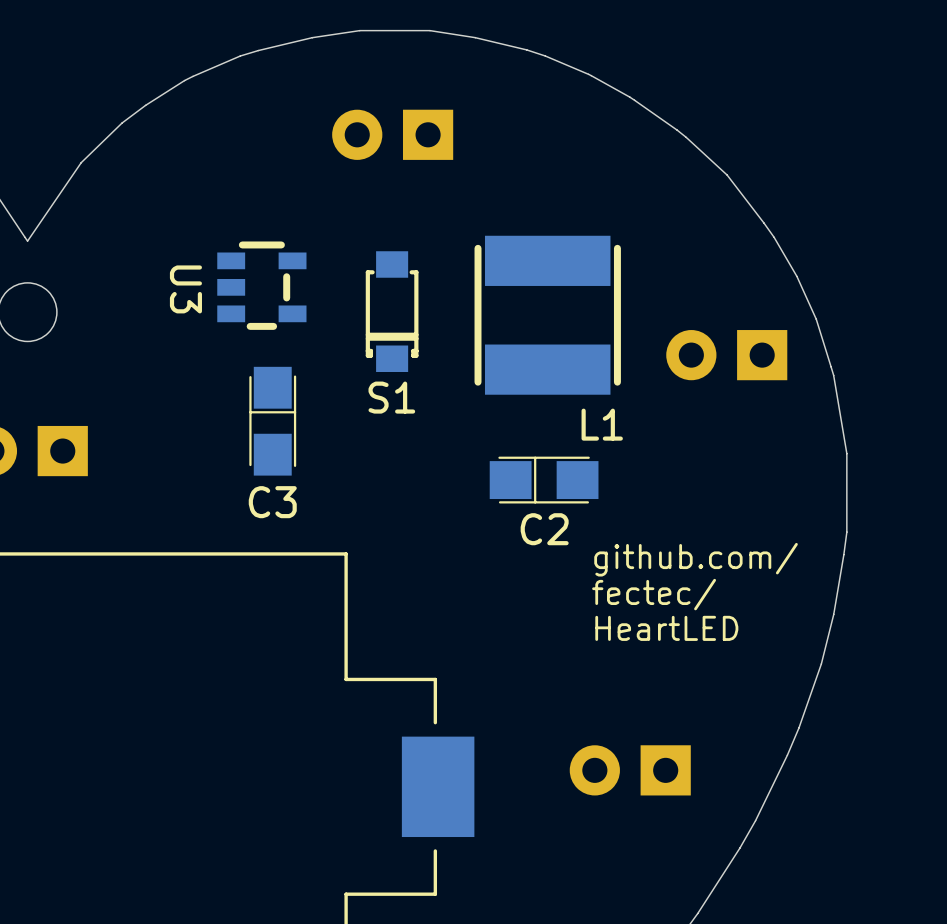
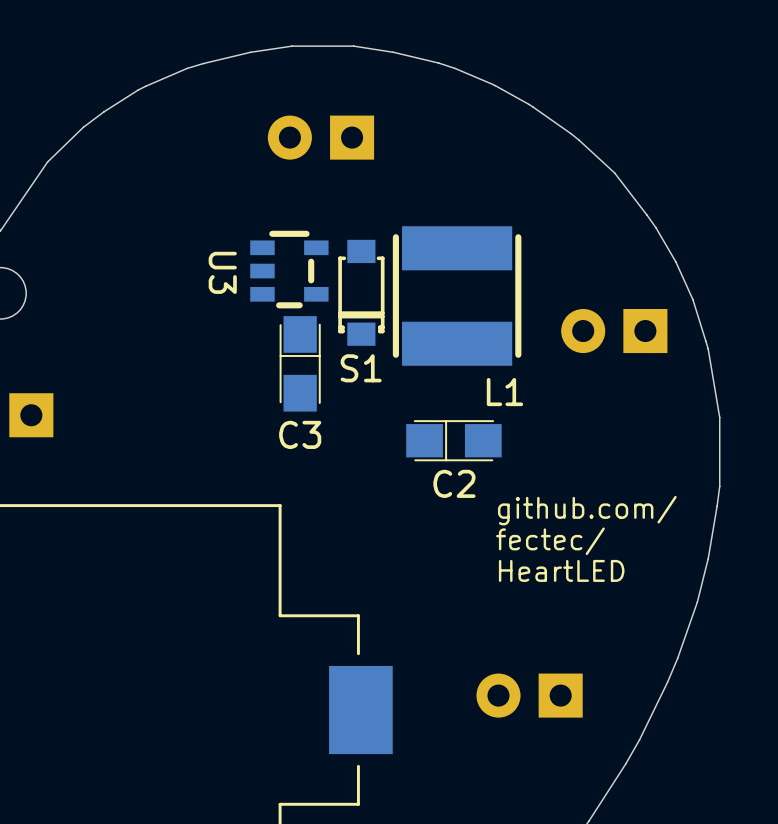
U3 position: (261, 285) -> (289, 269)
S1 position: (392, 311) -> (361, 292)
C3 position: (272, 421) -> (300, 363)

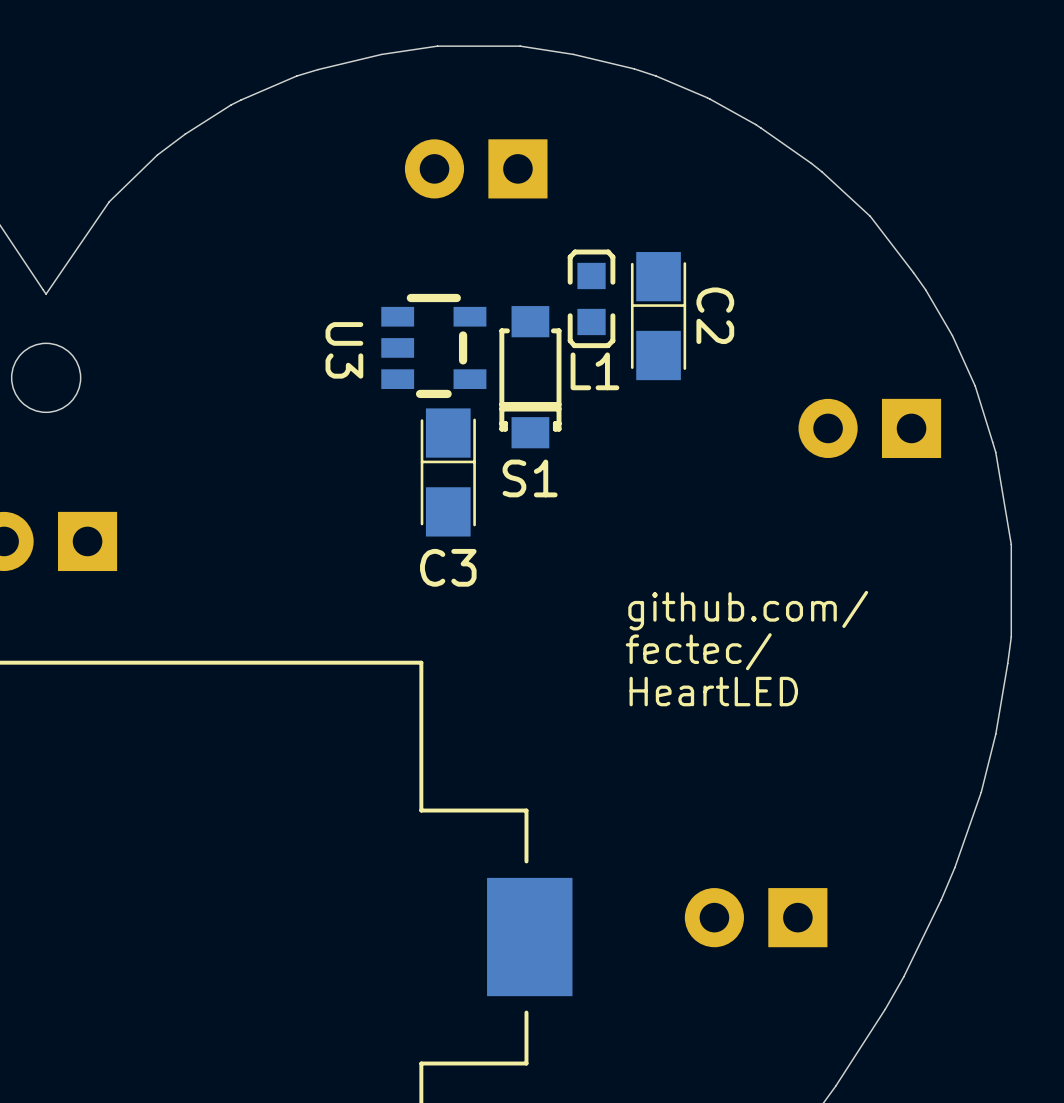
L1 footprint: [392, 226, 522, 366] -> [567, 249, 616, 349]
L1 name position: L1 (504, 392) -> L1 (594, 371)
C2 rotation: 0° (453, 440) -> 90° clockwise (658, 316)
C2 position: (453, 440) -> (658, 316)
C2 name position: C2 (454, 483) -> C2 (715, 315)
text position: github.com/ (587, 510) -> github.com/ (748, 610)
text position: fectec/ (550, 541) -> fectec/ (698, 651)
text position: HeartLED (561, 570) -> HeartLED (713, 691)

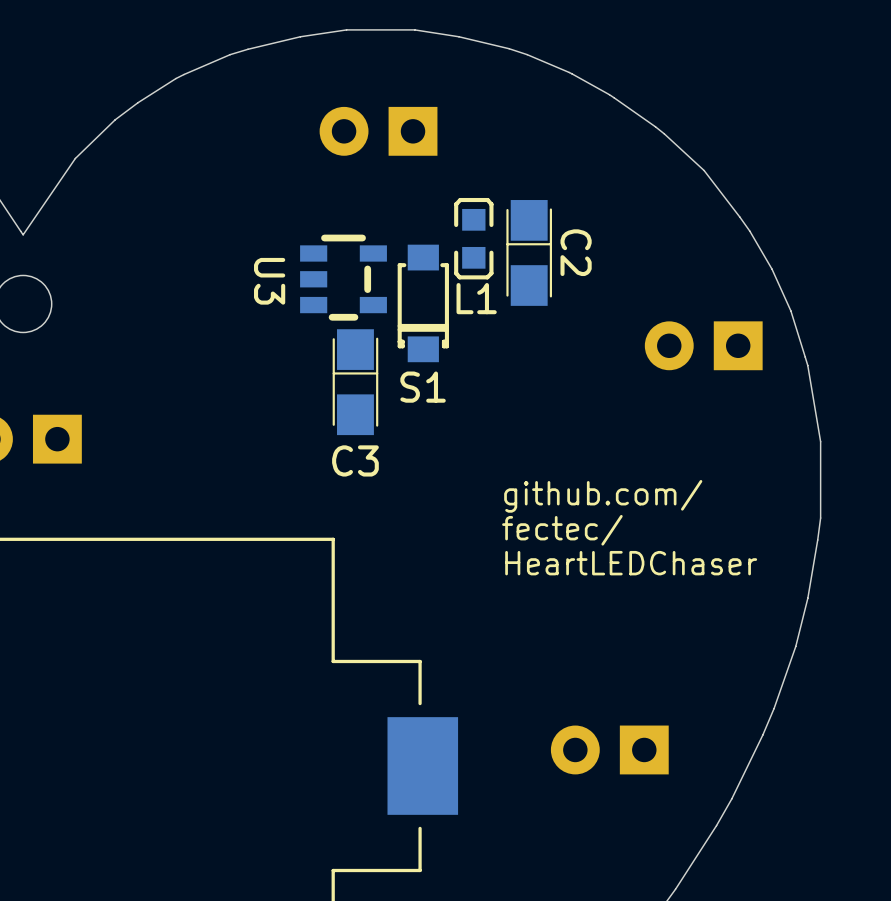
text: HeartLED (713, 691) -> HeartLEDChaser (631, 563)

